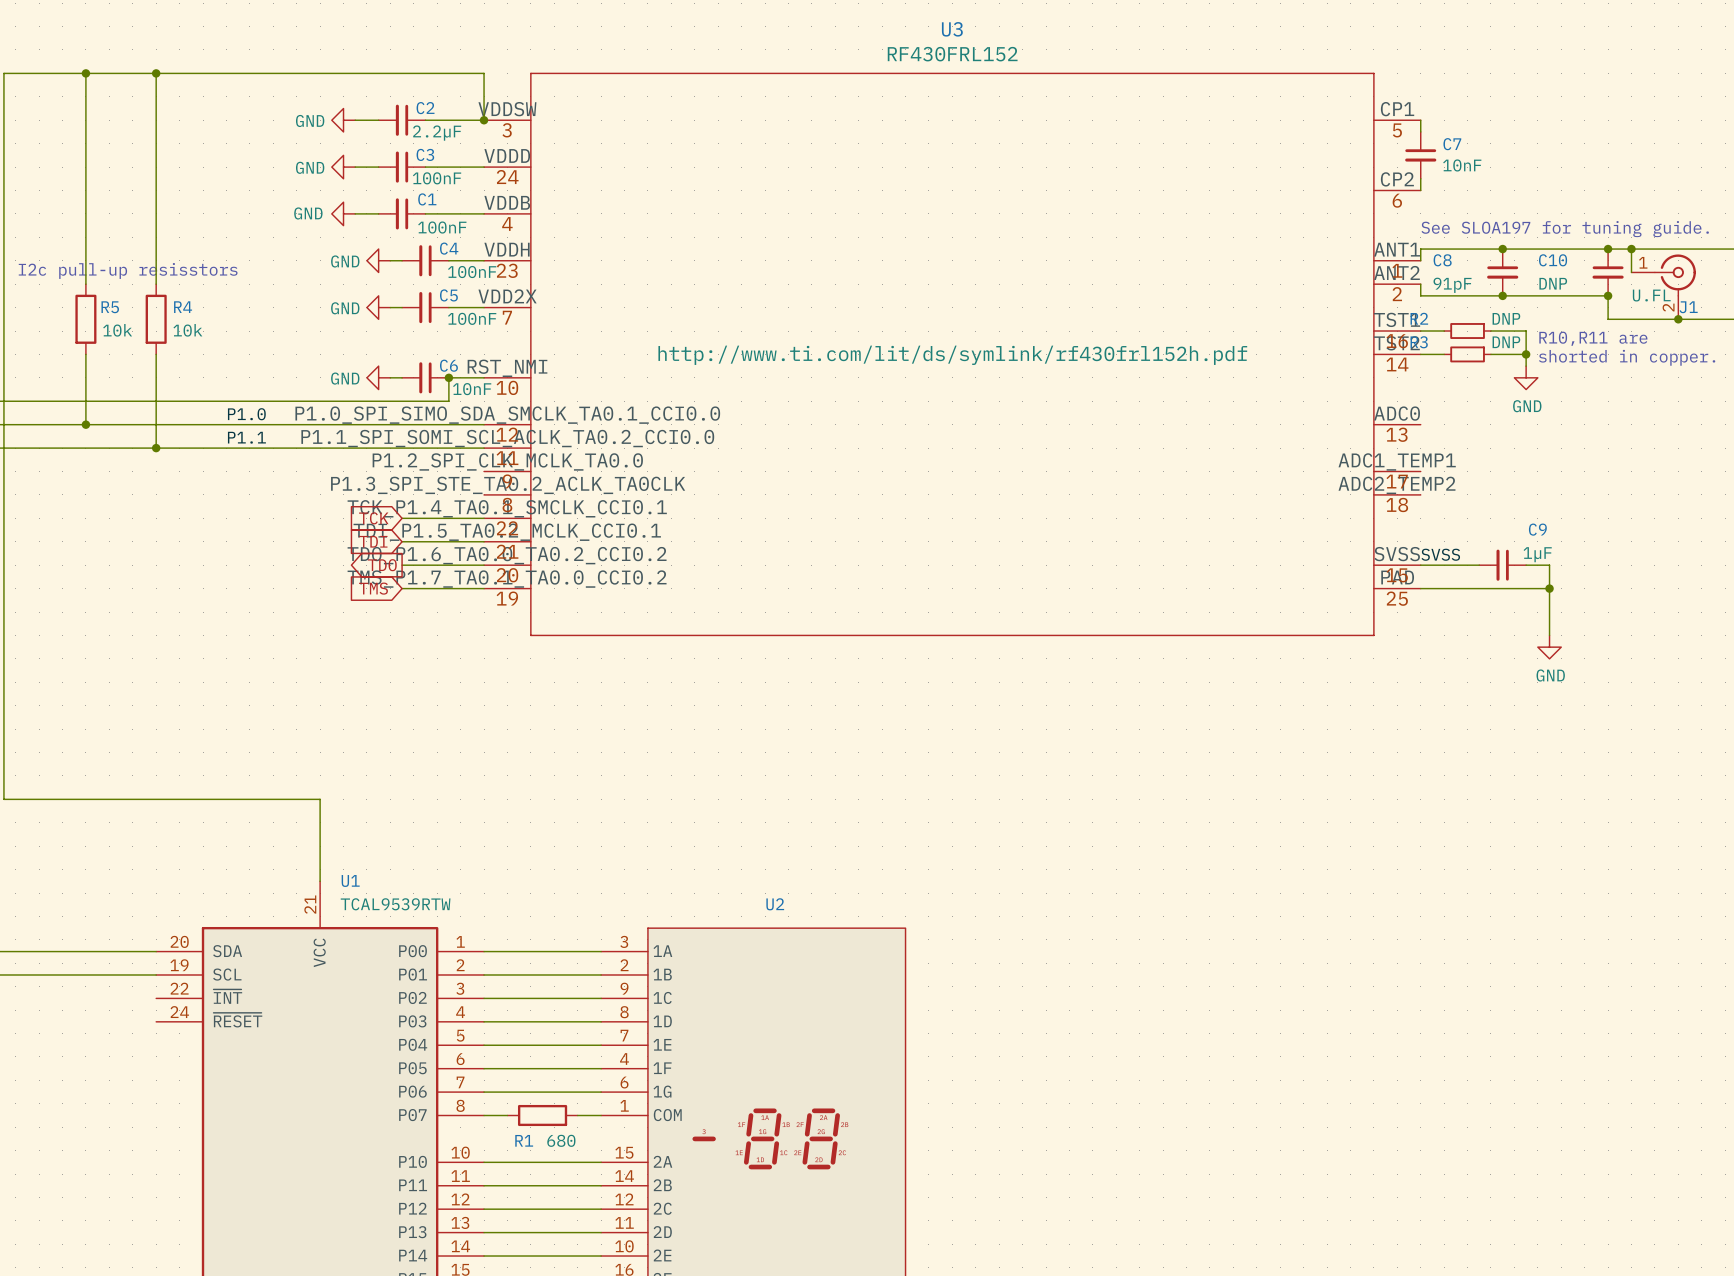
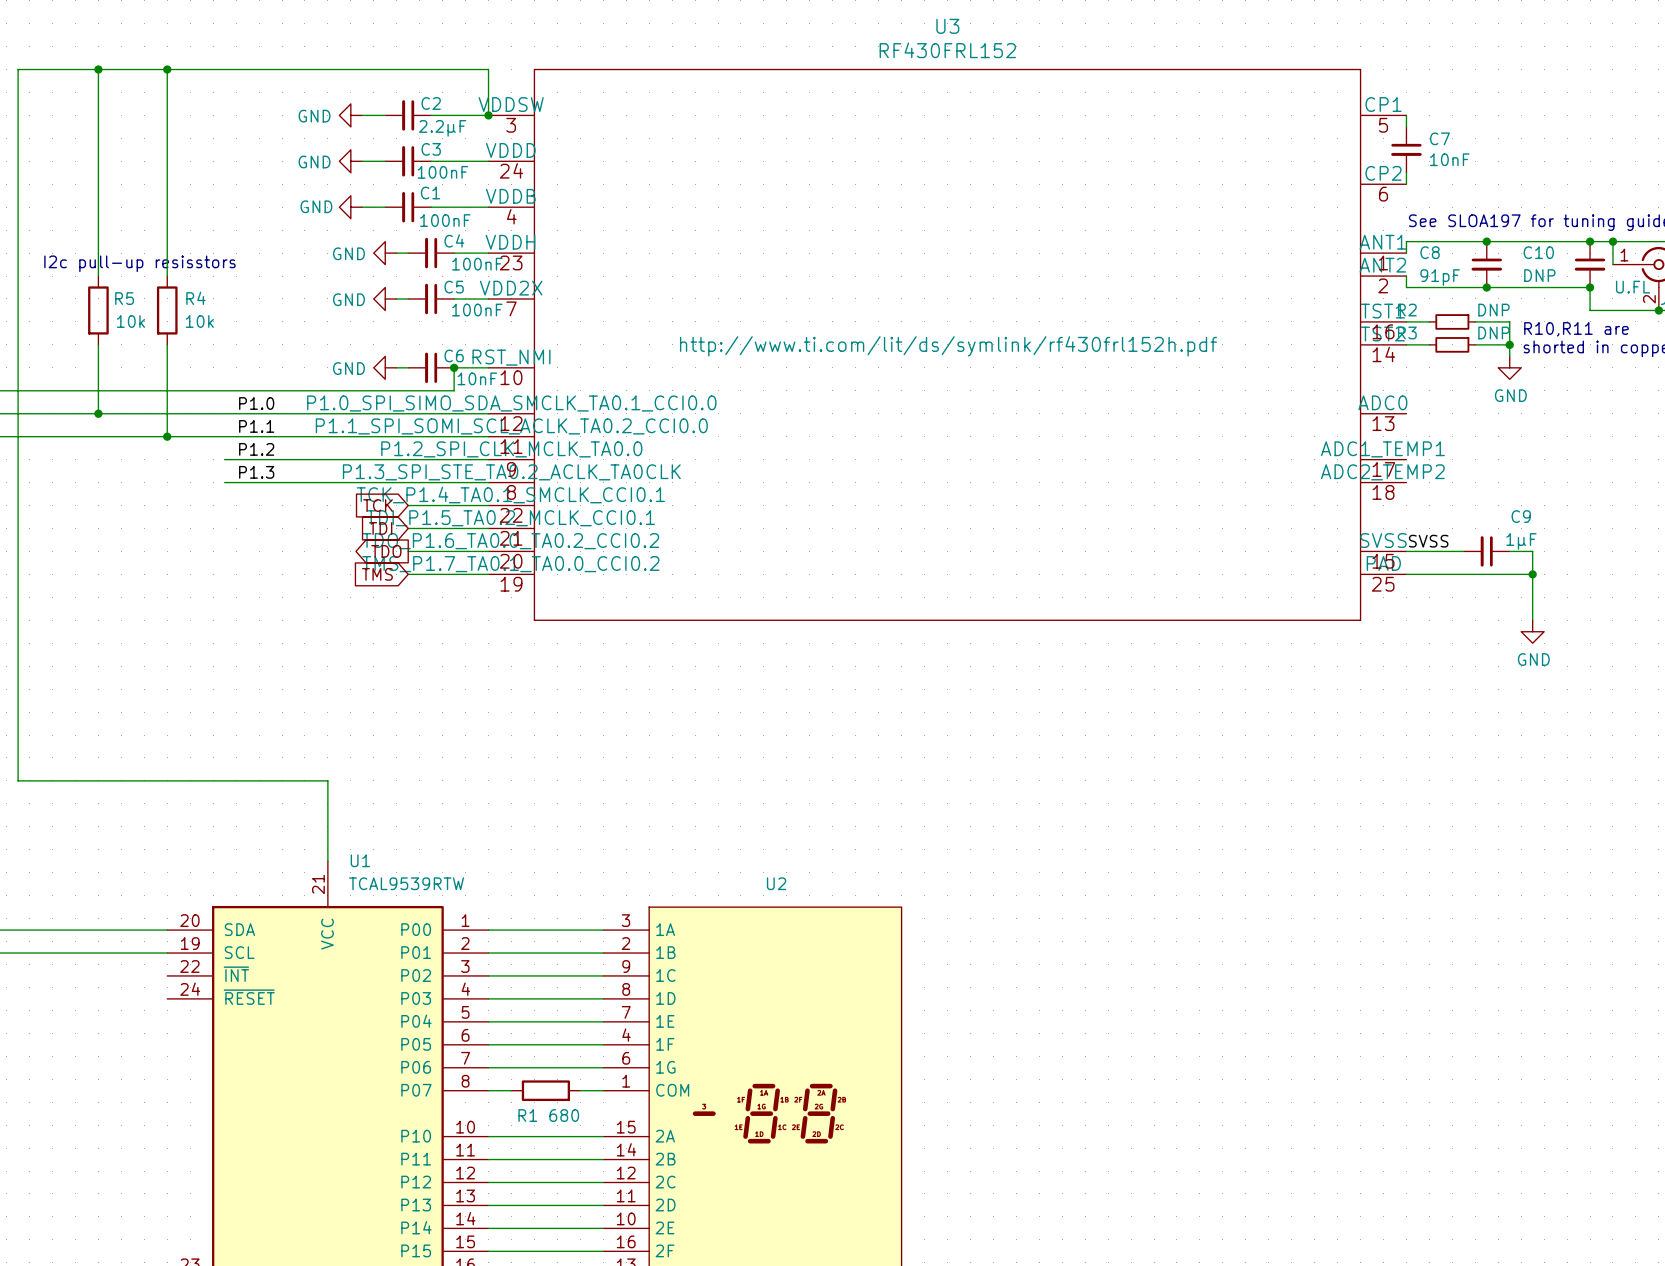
label: none -> P1.2 (256, 449)
wire: none -> (224, 459) (488, 459)
label: none -> P1.3 (256, 472)
wire: none -> (224, 482) (488, 482)

